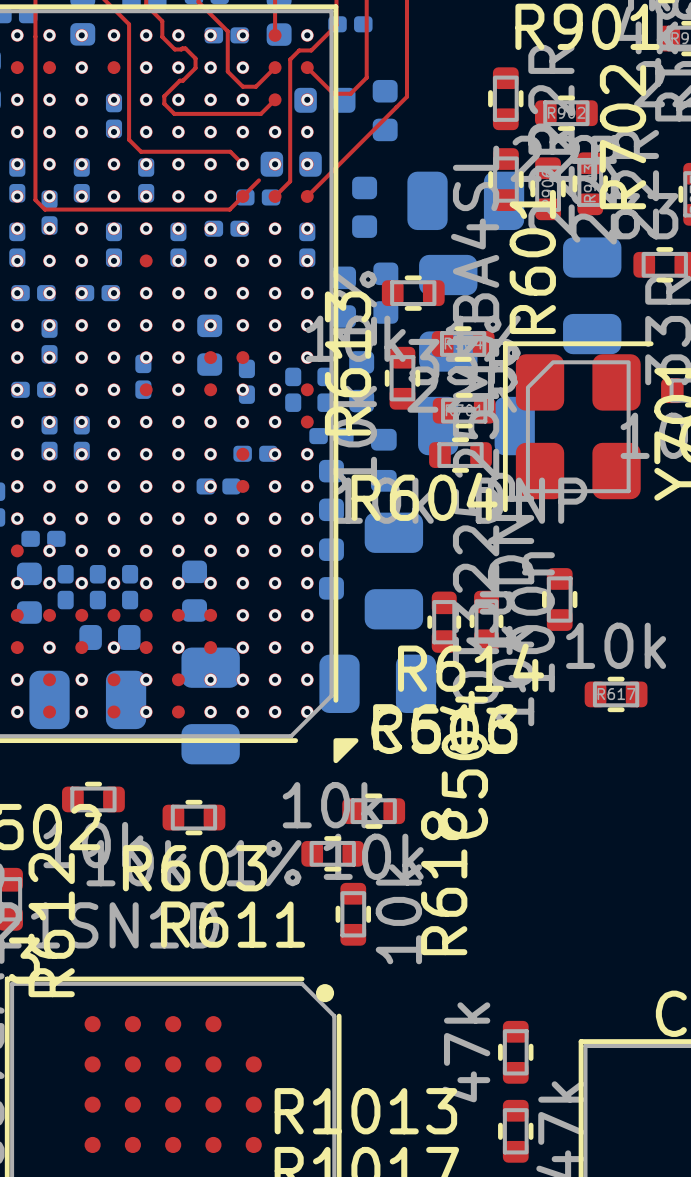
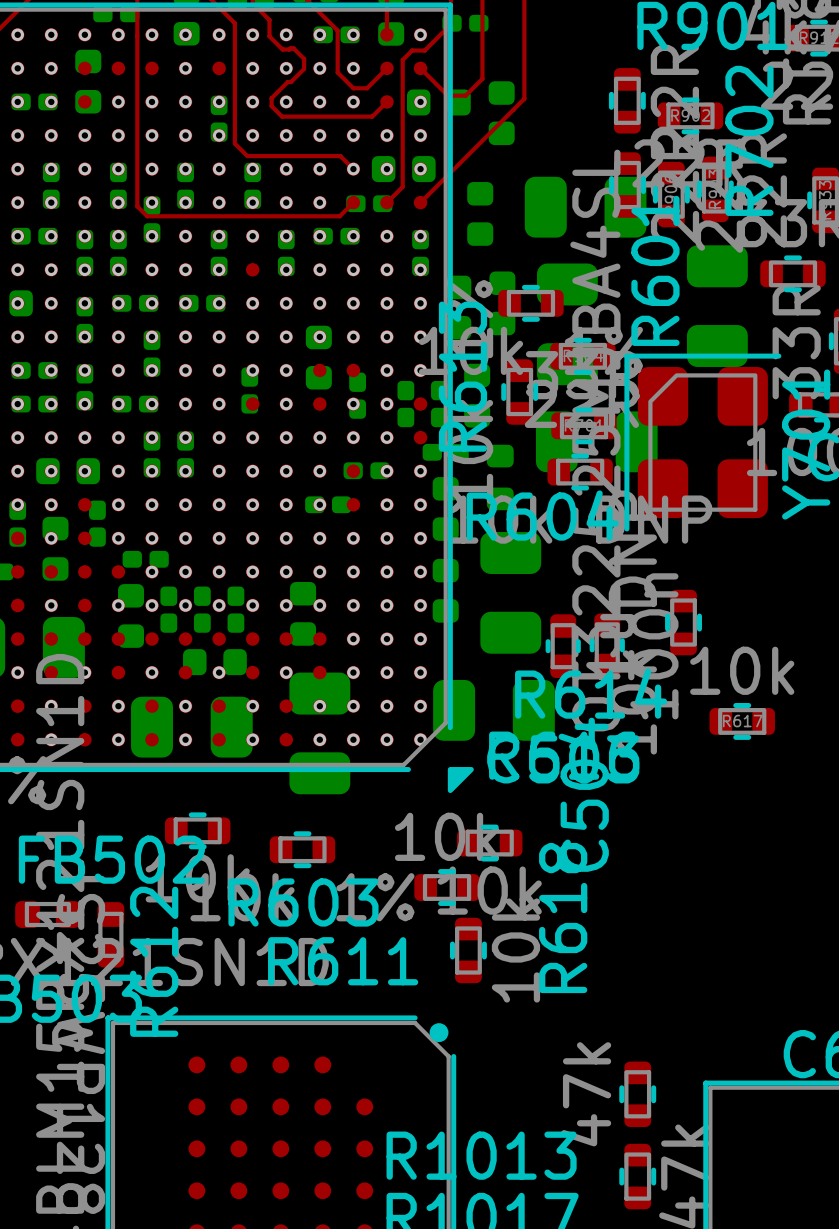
top track: (258, 180) (242, 196) -> none

